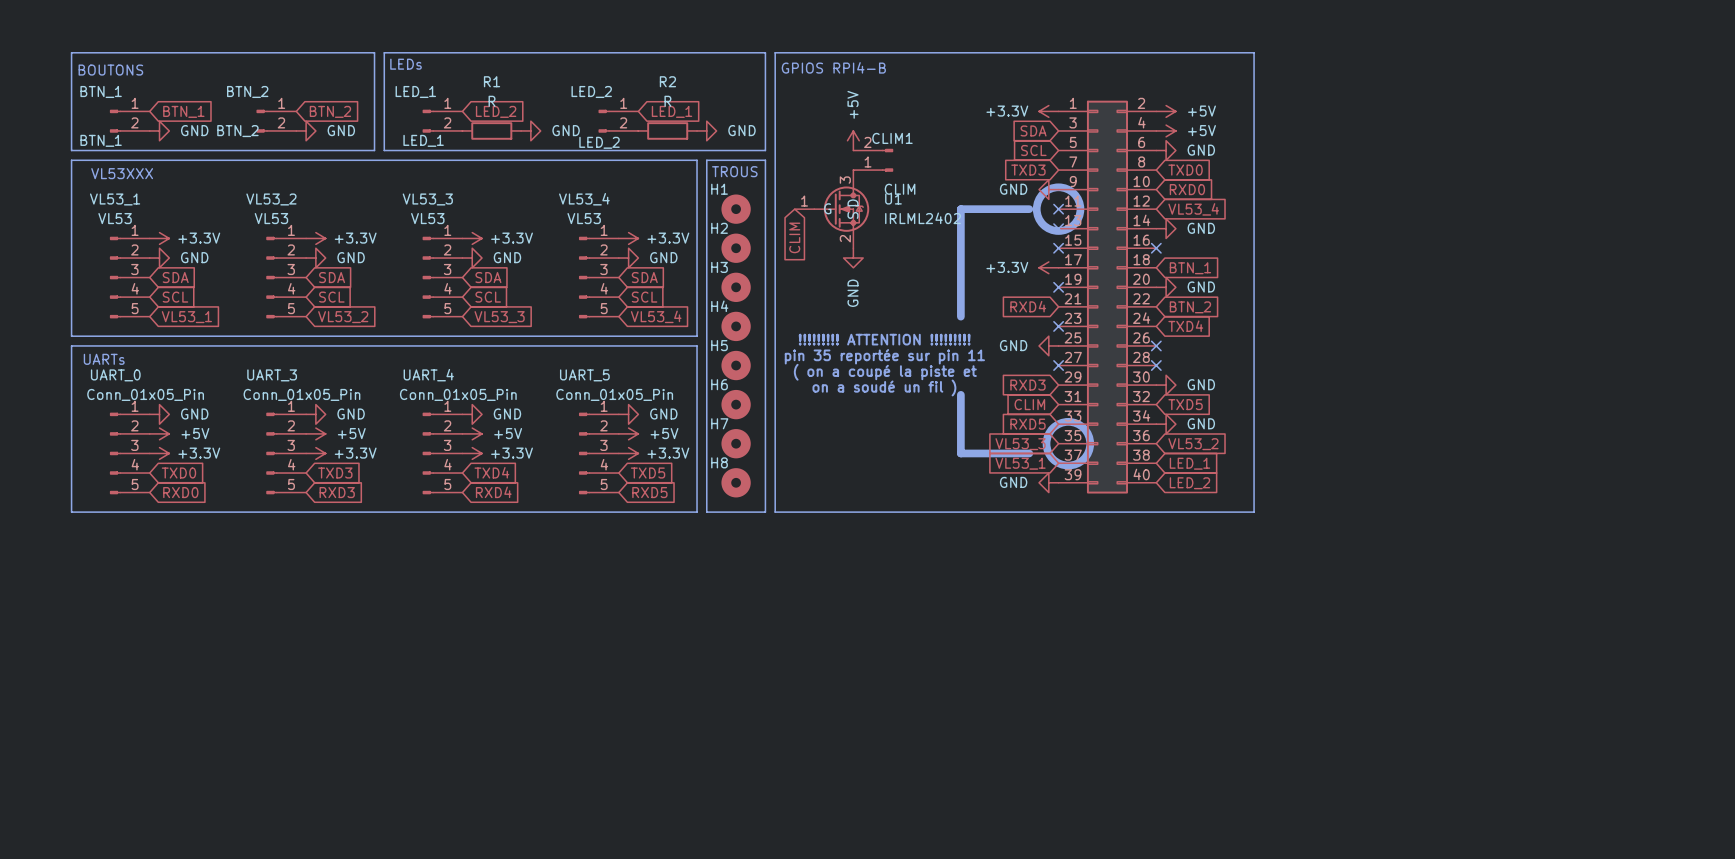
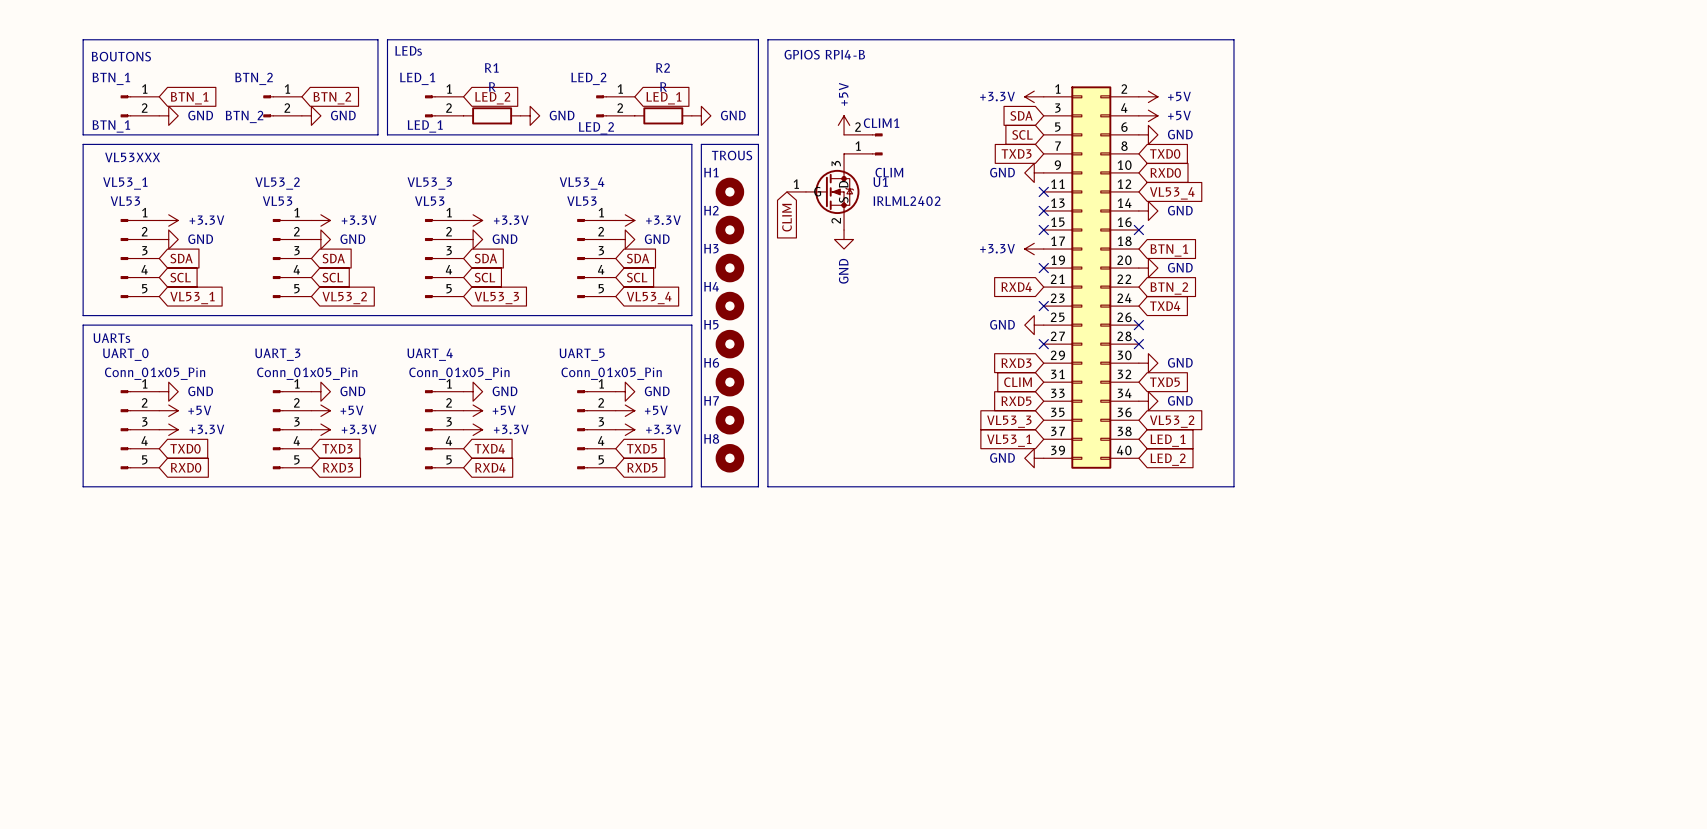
drawing: [1032, 183, 1085, 235] -> none
line: (1029, 209) (960, 209) (960, 316) -> none
text: !!!!!!!!! ATTENTION !!!!!!!!! (884, 339) -> none
text: pin 35 reportée sur pin 11 (884, 356) -> none
text: ( on a coupé la piste et (885, 372) -> none
text: on a soudé un fil ) (884, 387) -> none
line: (960, 394) (960, 453) (1029, 453) -> none
drawing: [1042, 417, 1095, 470] -> none

